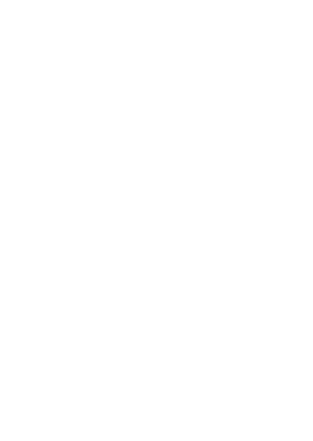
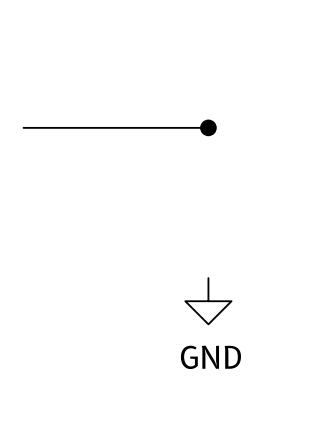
wire: none -> (23, 127) (208, 127)
junction: none -> (208, 127)
power symbol: none -> GND (208, 301)

